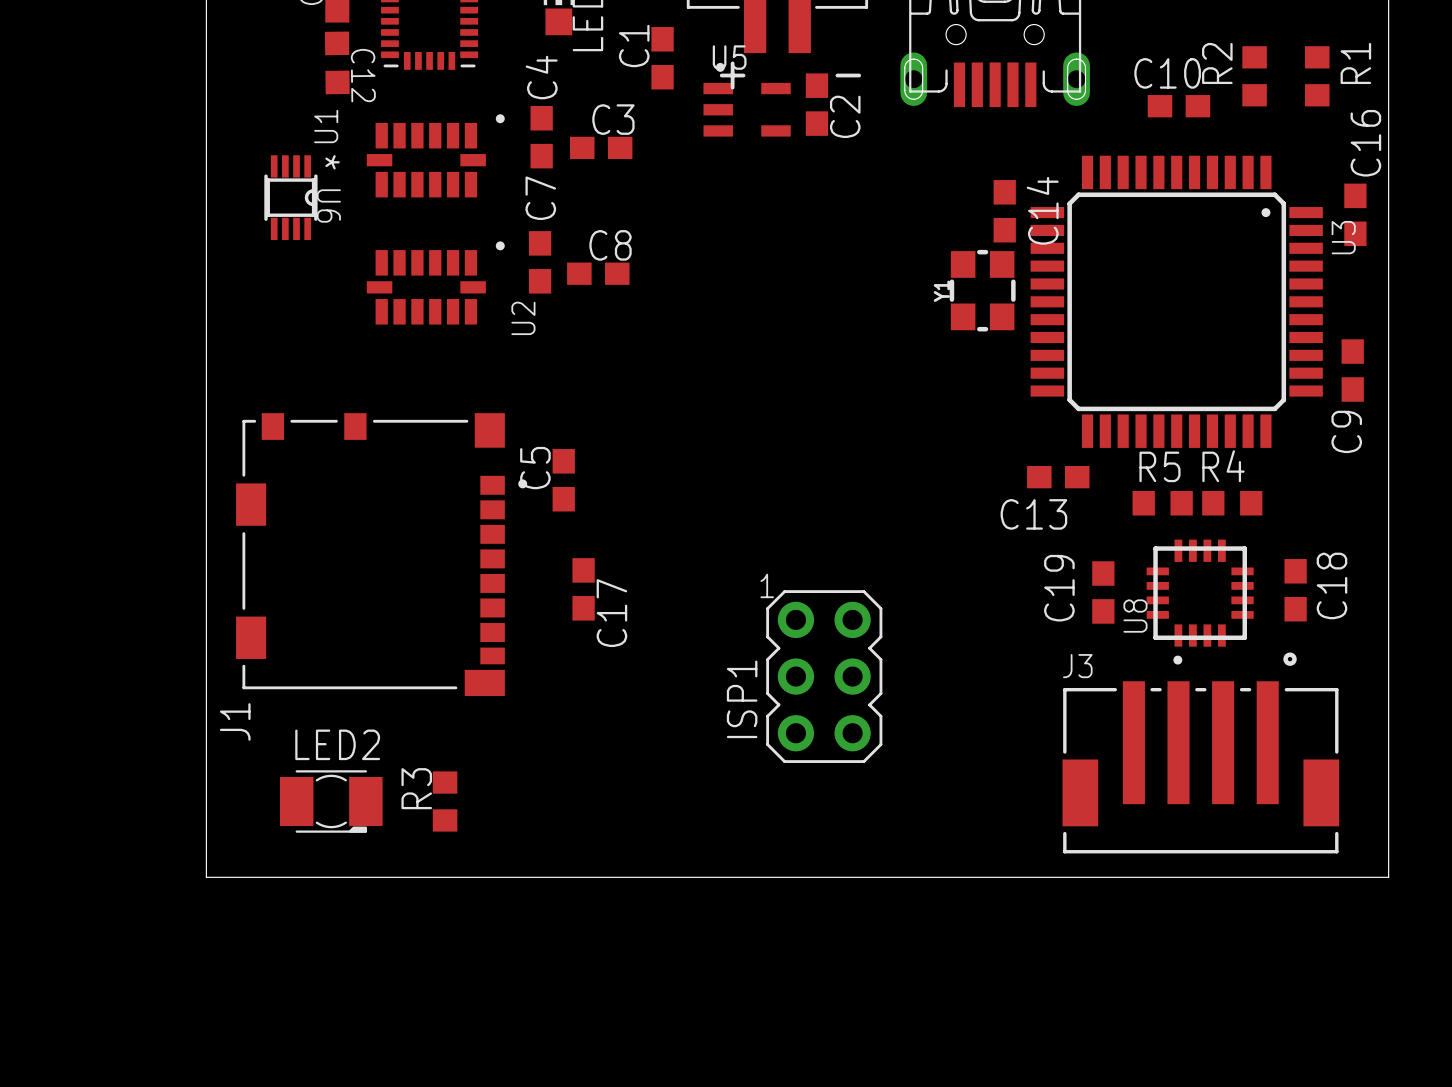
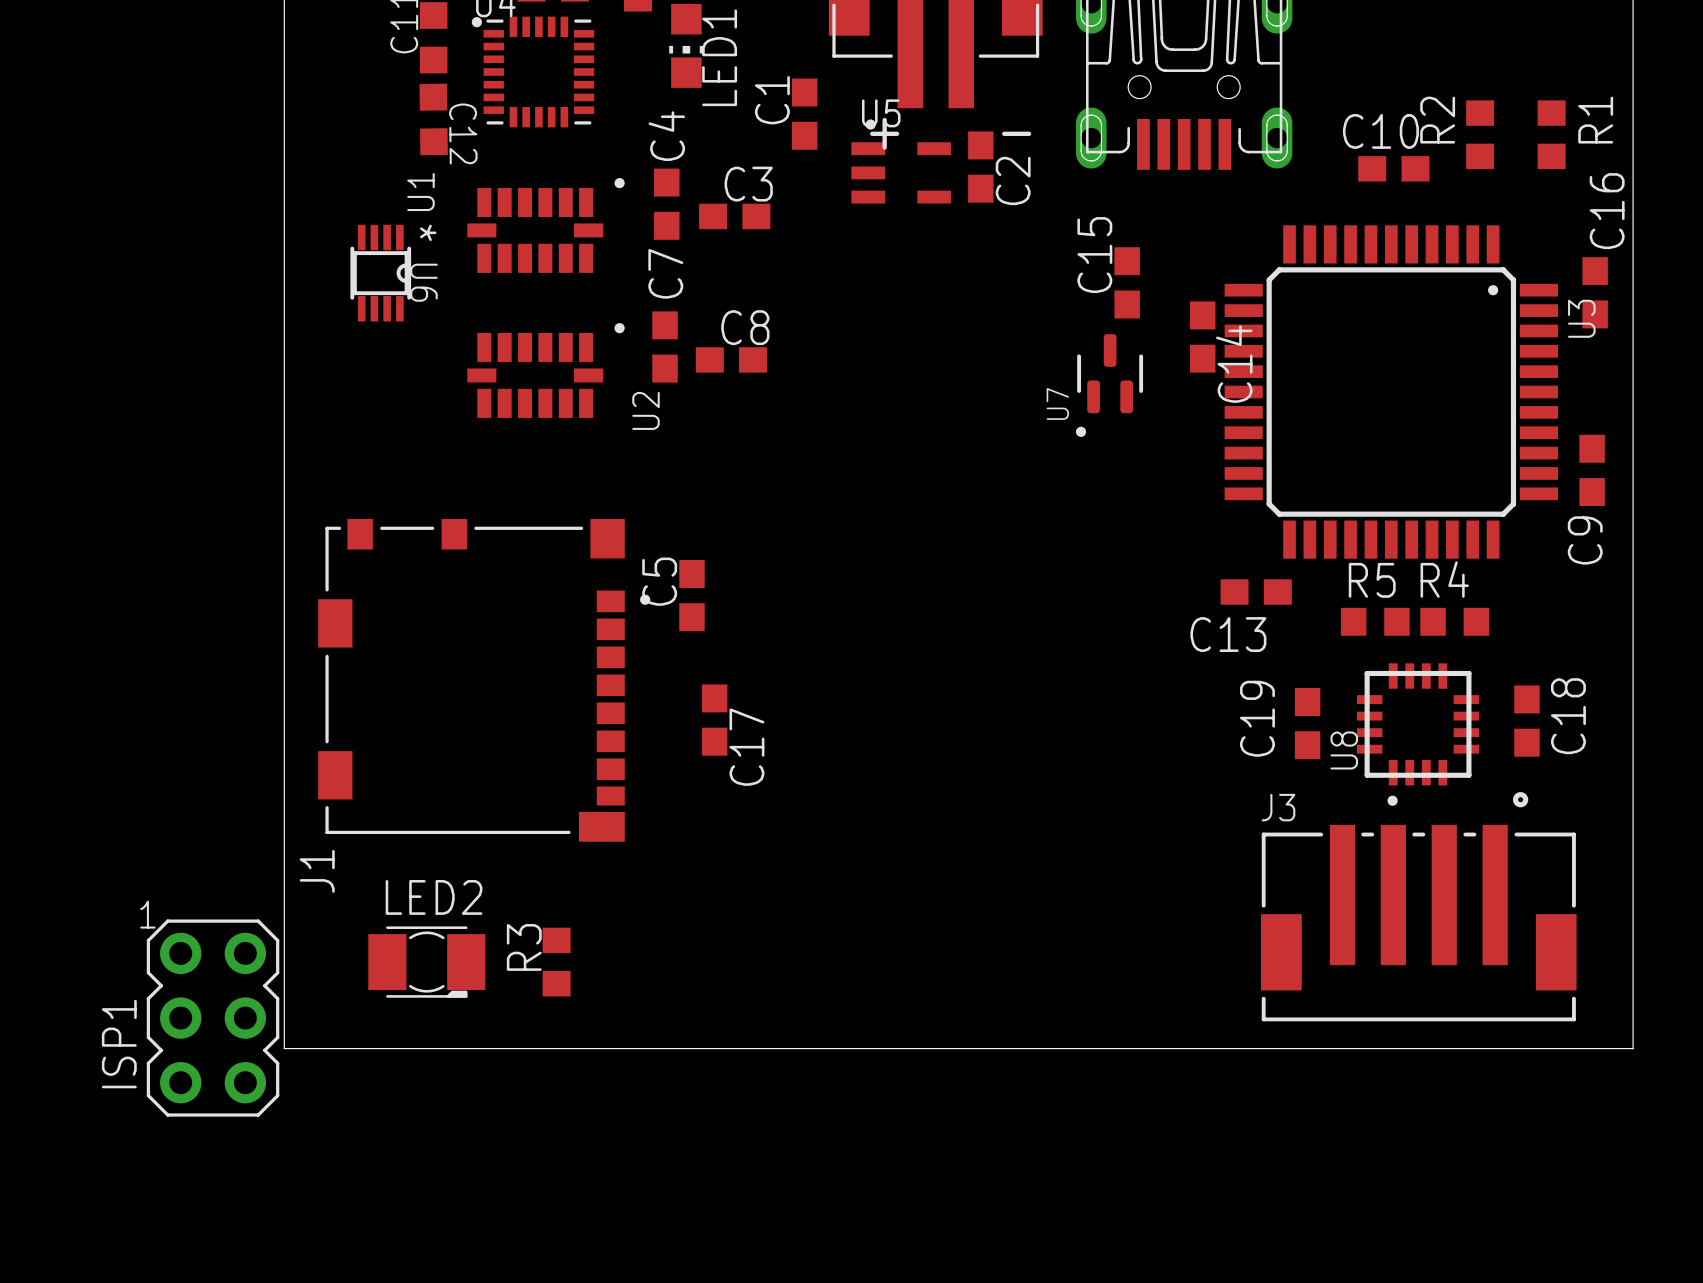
C15: none -> (1127, 282)
C14 name position: C14 (1042, 210) -> C14 (1234, 364)
C14 position: (1004, 211) -> (1202, 337)
Y1: (982, 290) -> none
U7: none -> (1109, 385)
ISP1 position: (824, 676) -> (213, 1018)

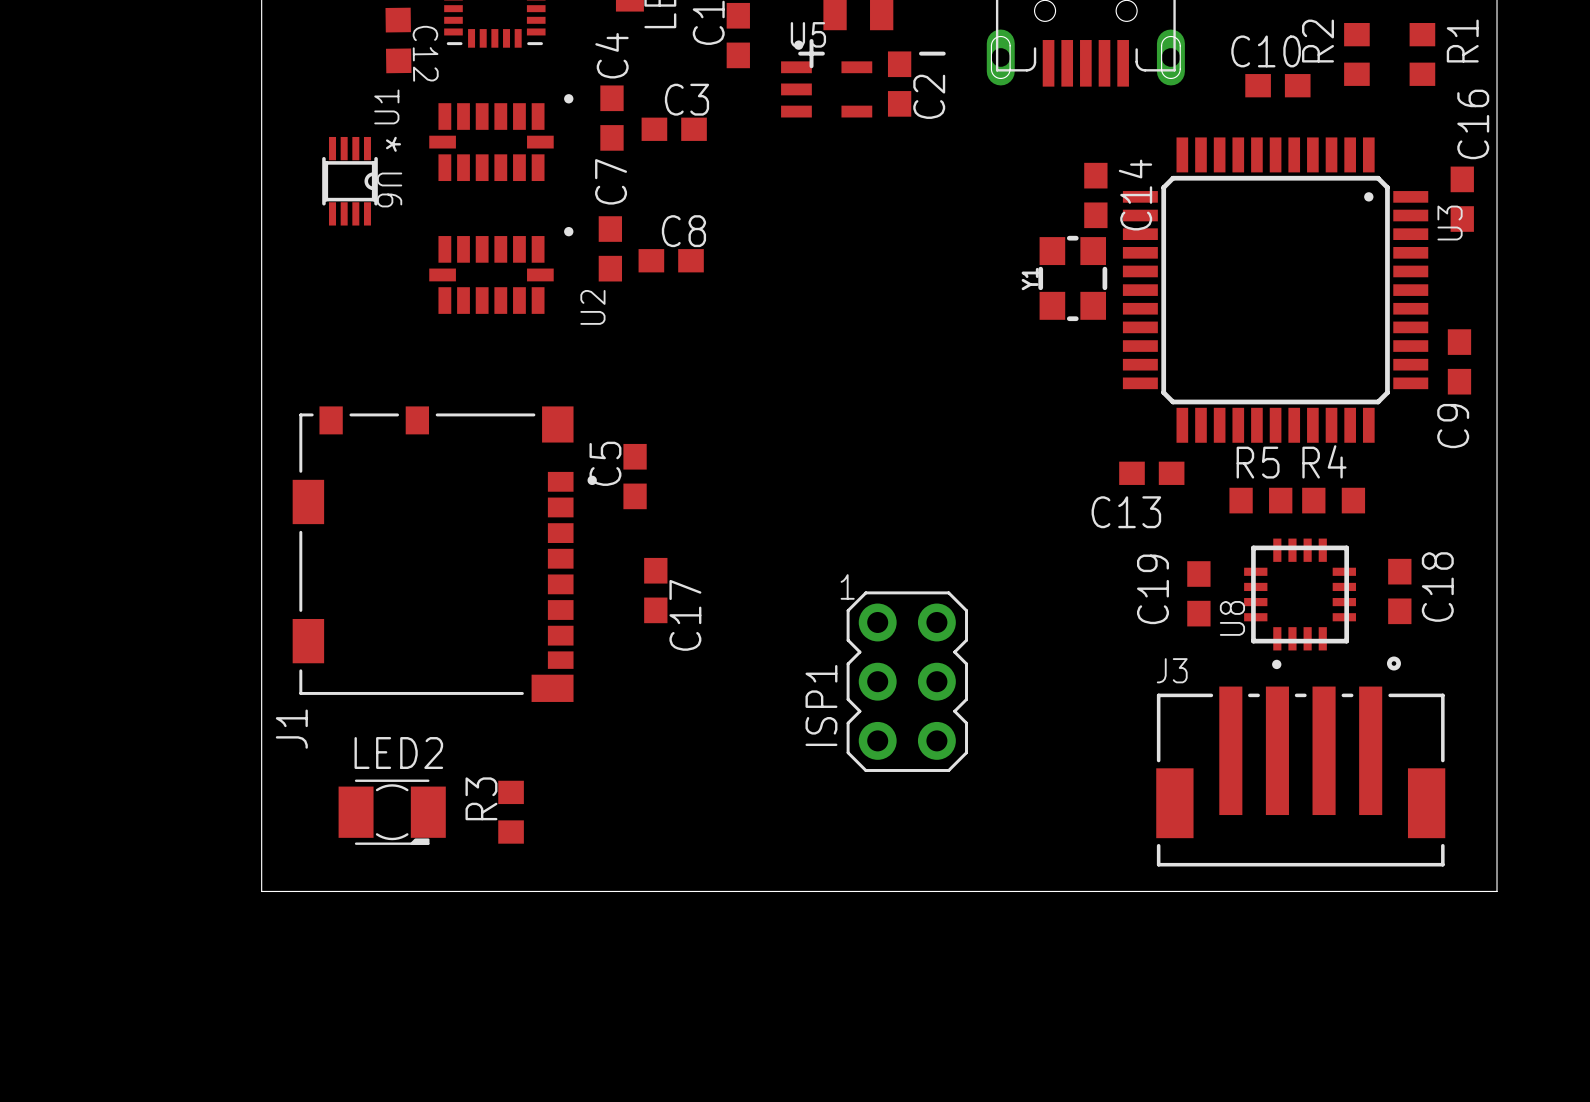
C15: (1127, 282) -> none
C14 position: (1202, 337) -> (1095, 195)
C14 name position: C14 (1234, 364) -> C14 (1135, 195)
Y1: none -> (1072, 278)
U7: (1109, 385) -> none
ISP1 position: (213, 1018) -> (907, 681)

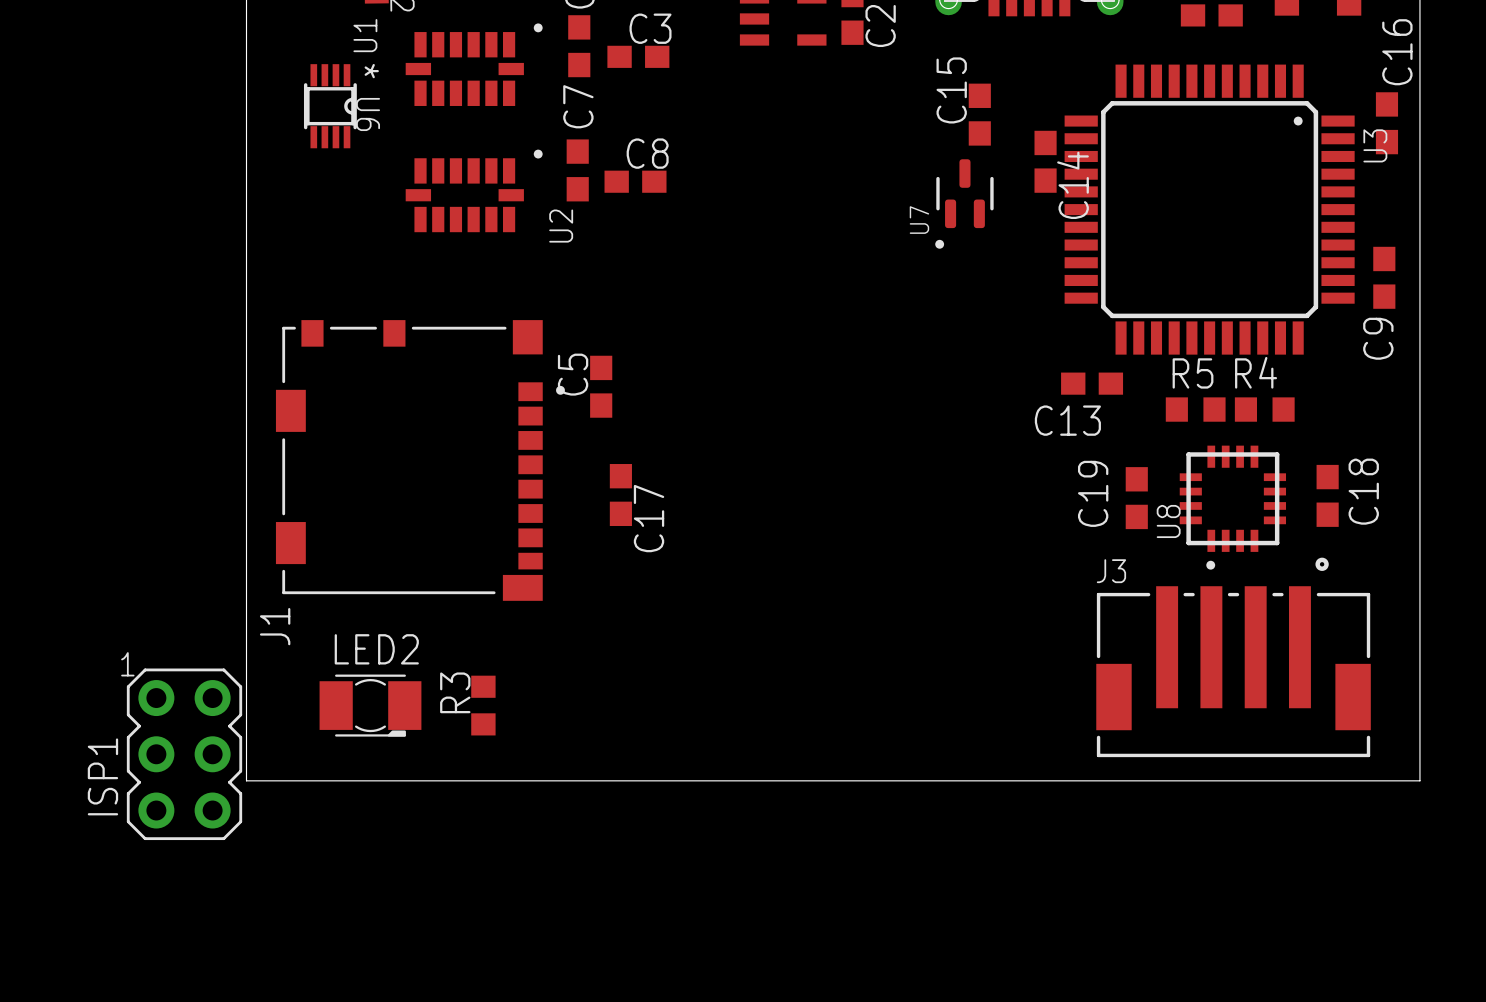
C15: none -> (979, 114)
C14 position: (1095, 195) -> (1045, 161)
C14 name position: C14 (1135, 195) -> C14 (1073, 185)
Y1: (1072, 278) -> none
U7: none -> (964, 203)
ISP1 position: (907, 681) -> (184, 754)

